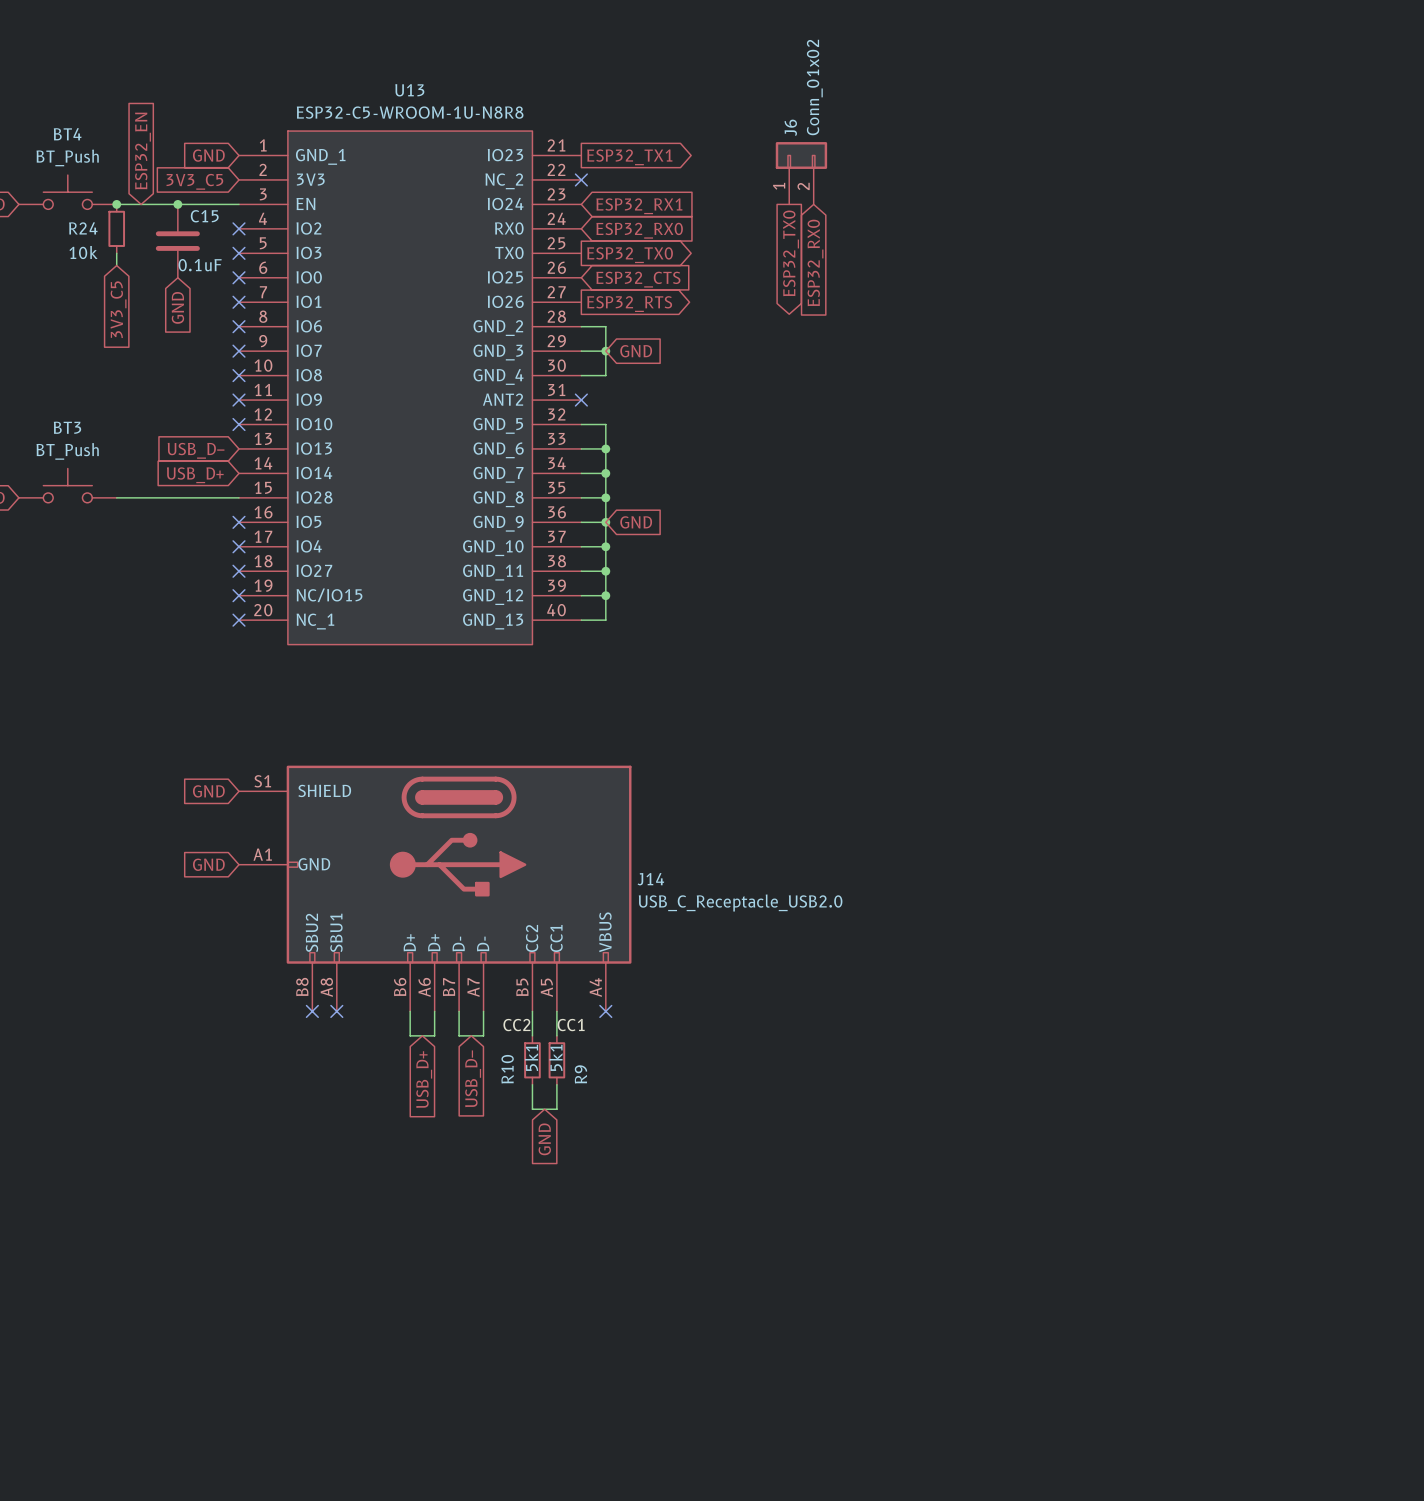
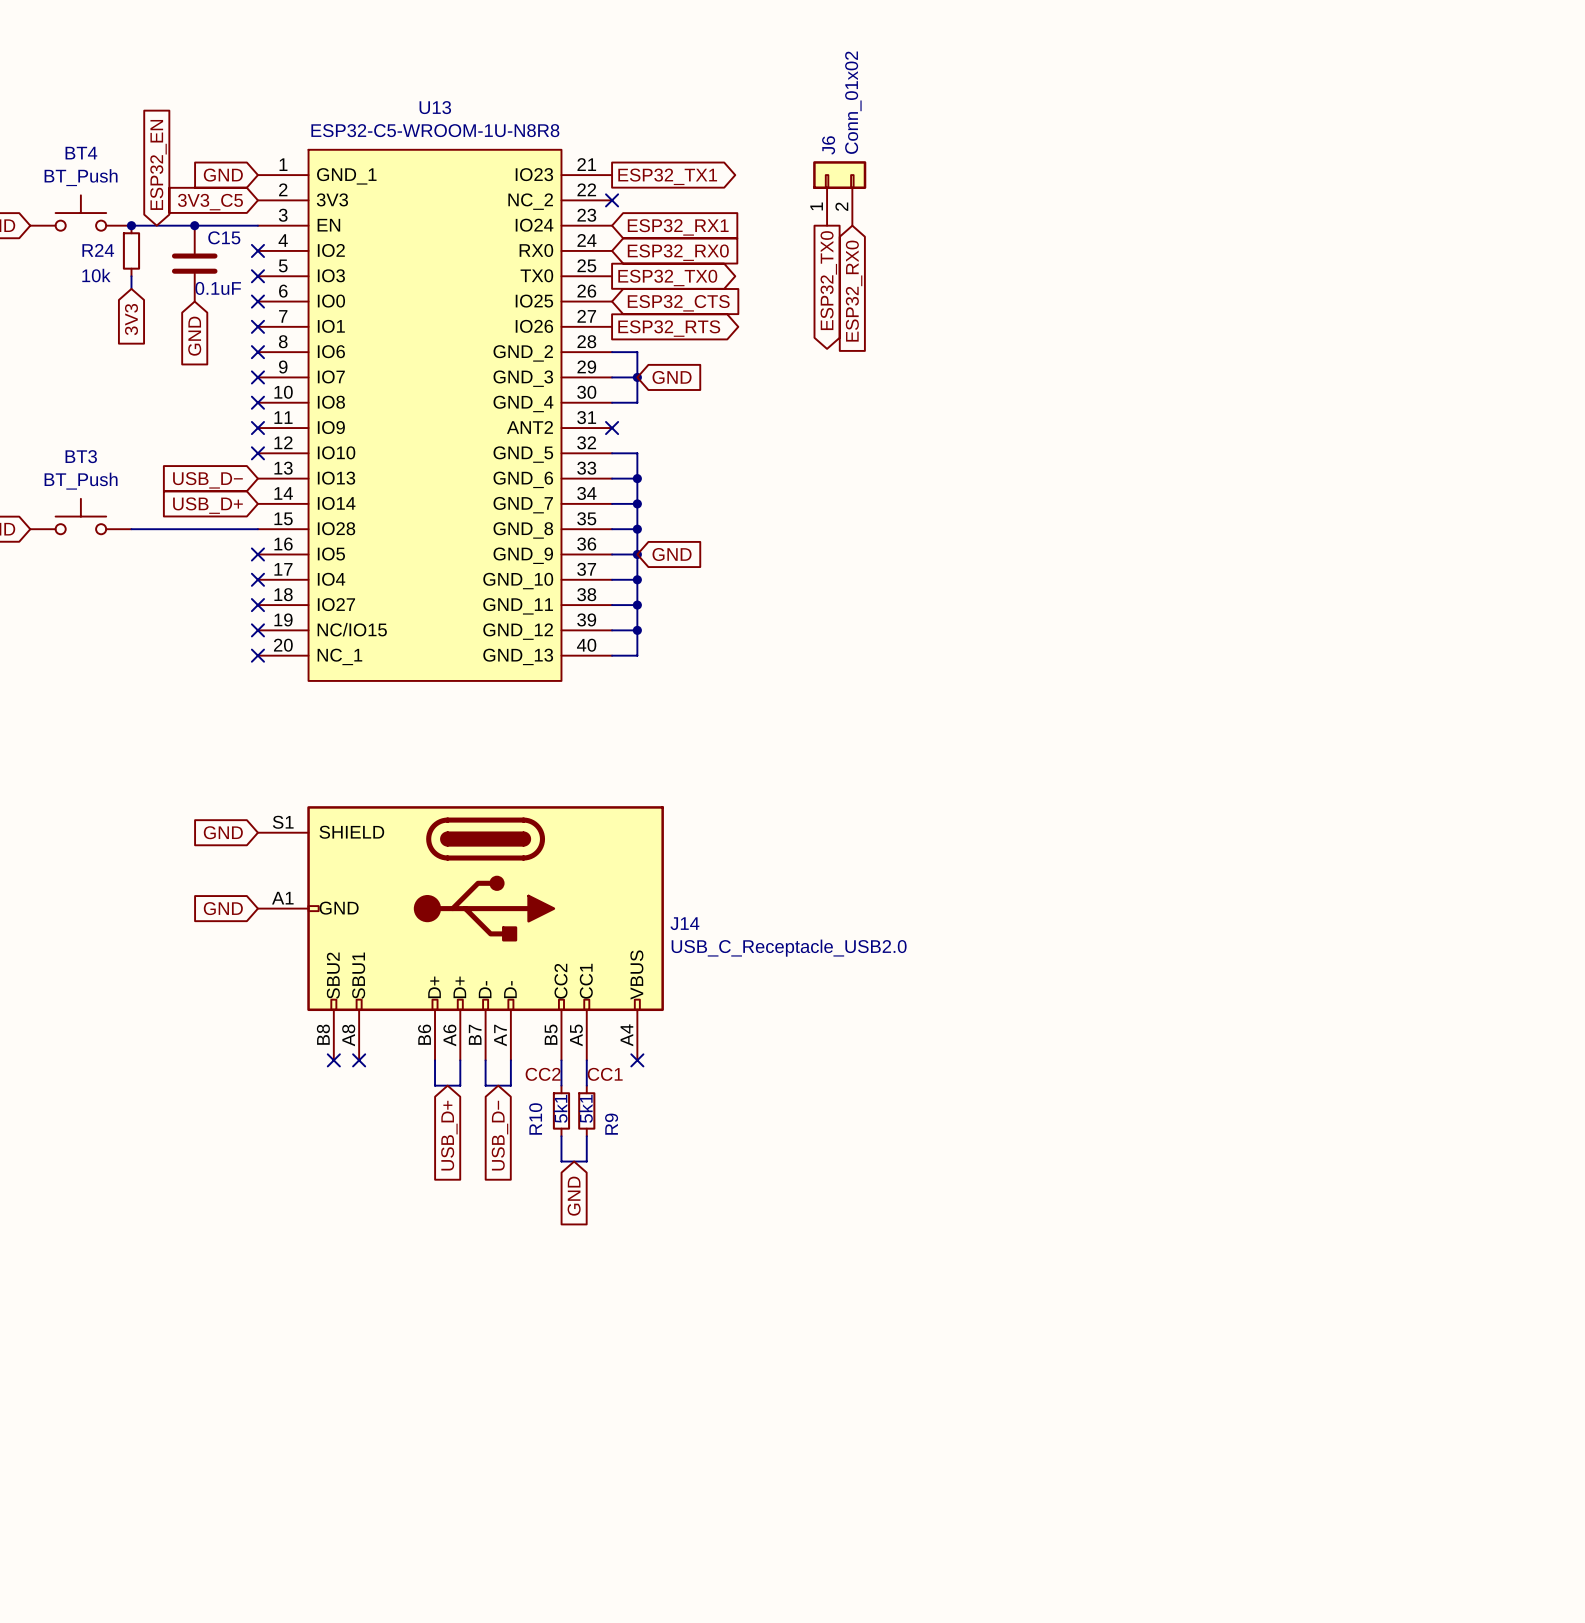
global label: 3V3_C5 (118, 309) -> 3V3 (131, 319)

